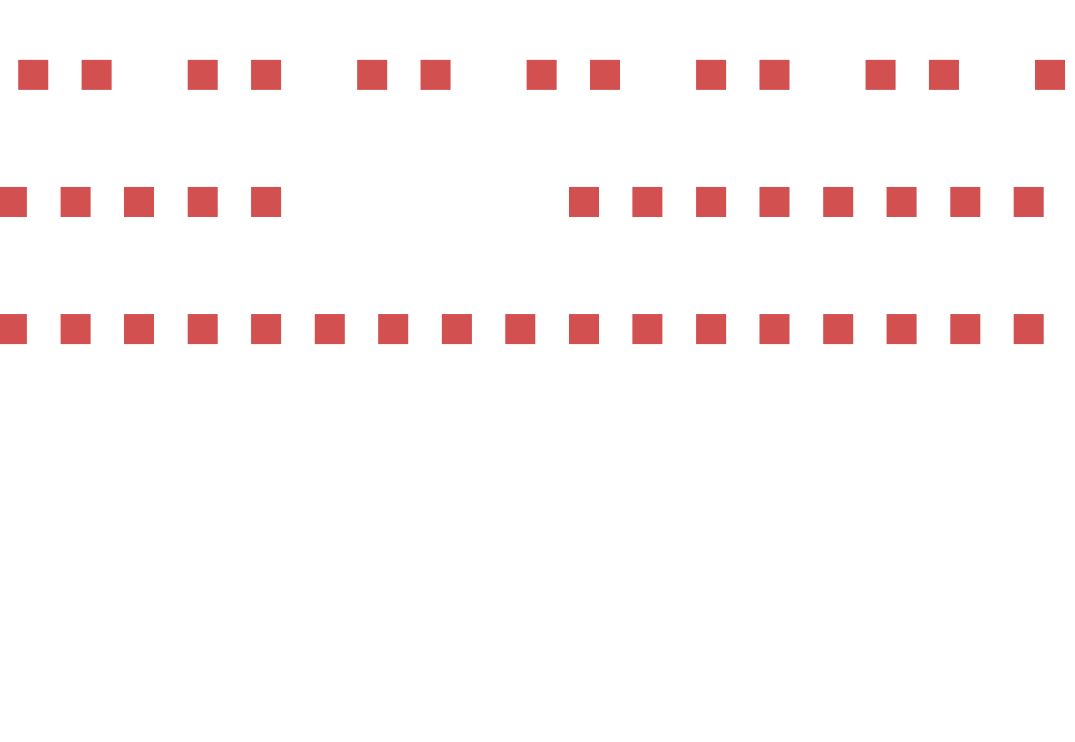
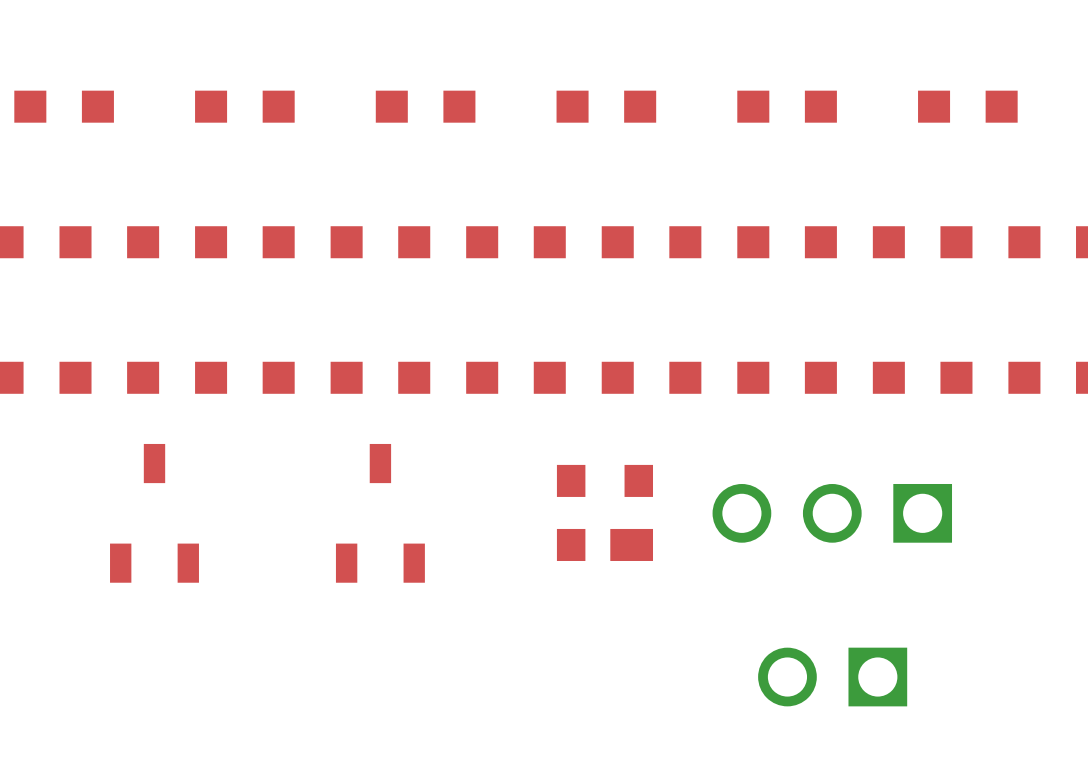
part: none -> (380, 242)
part: none -> (515, 242)
part: none -> (604, 512)
part: none -> (154, 513)
part: none -> (380, 513)
part: none -> (832, 513)
part: none -> (832, 677)

